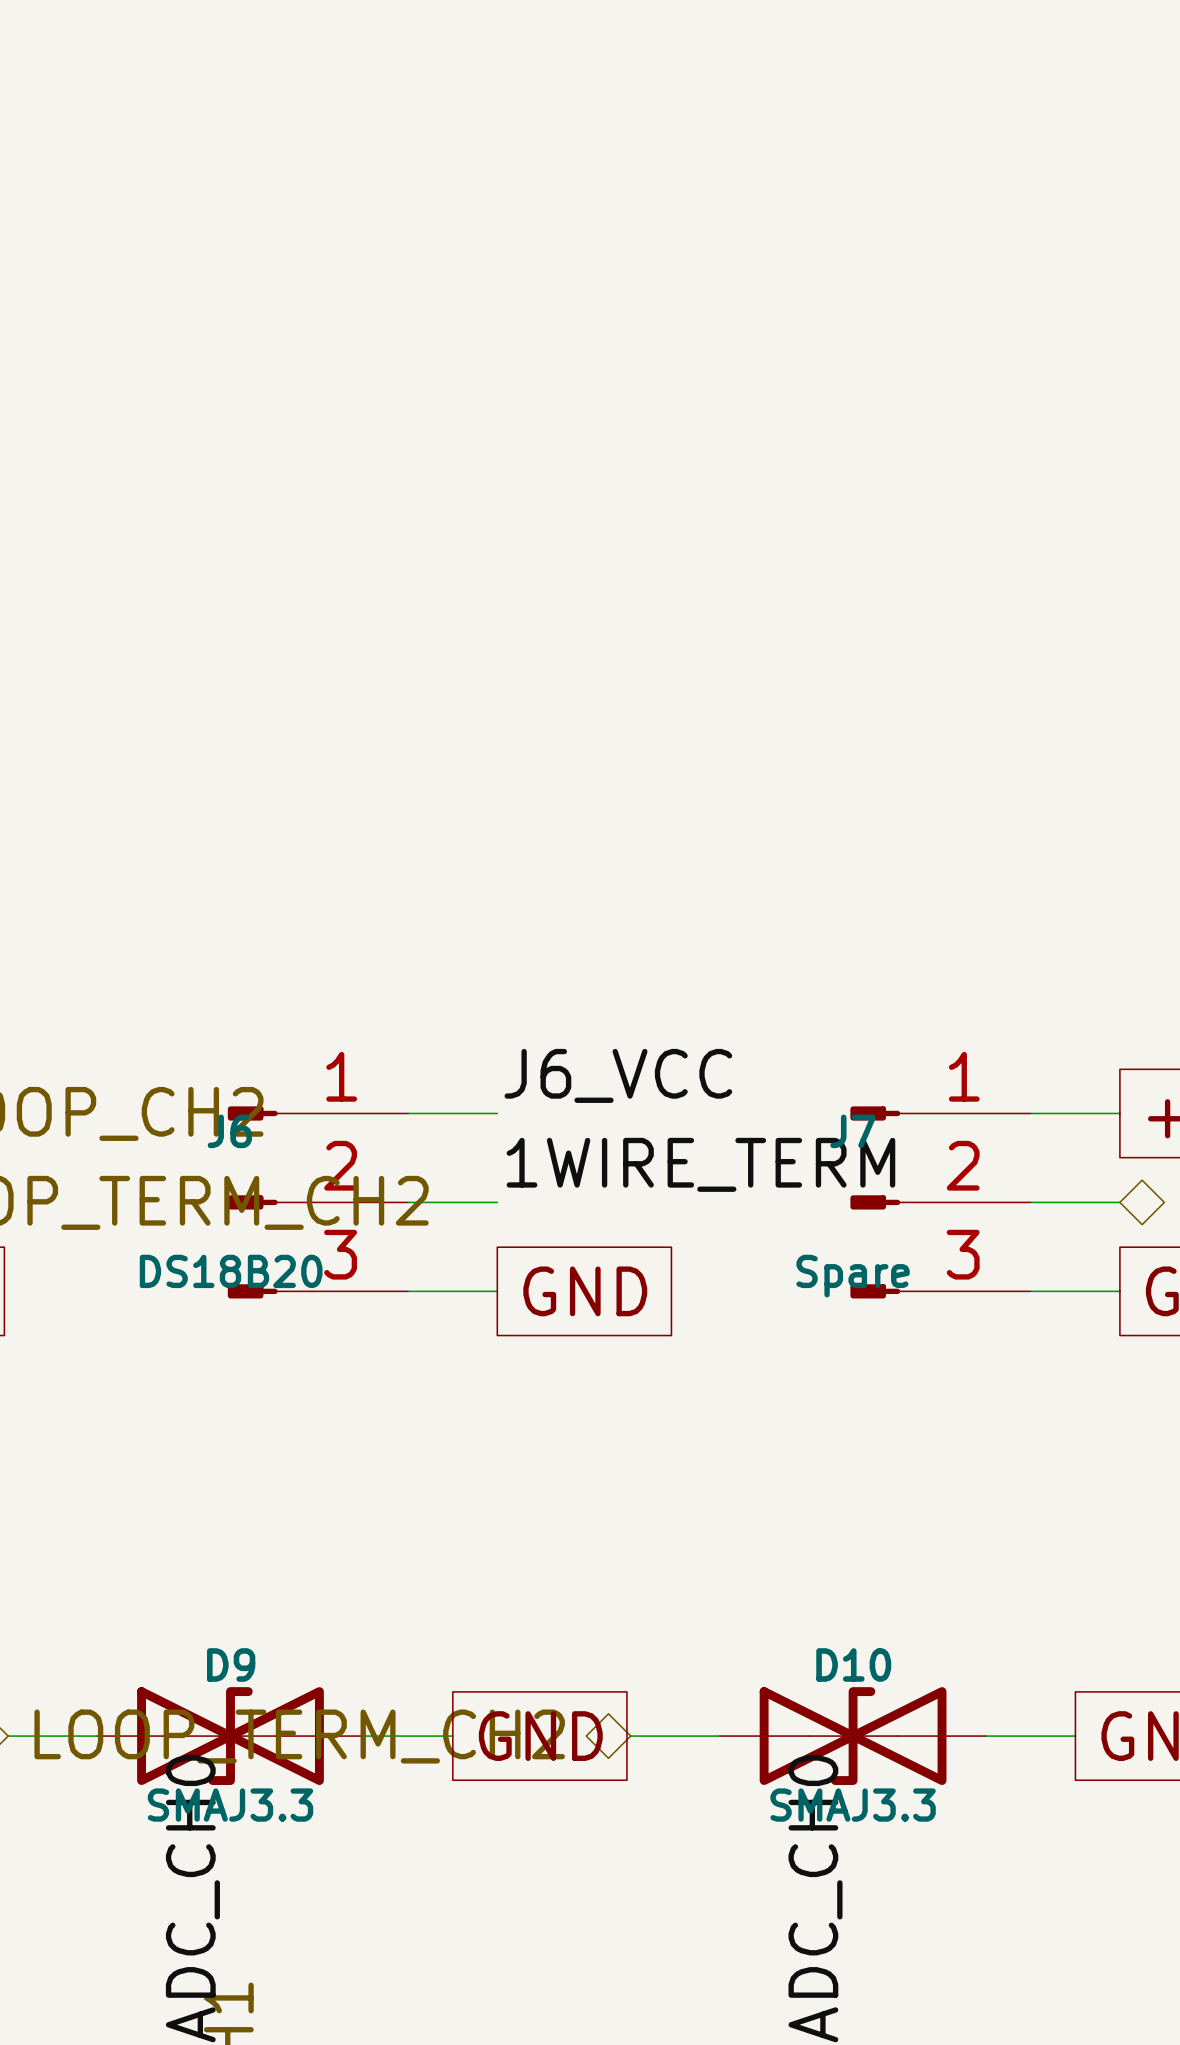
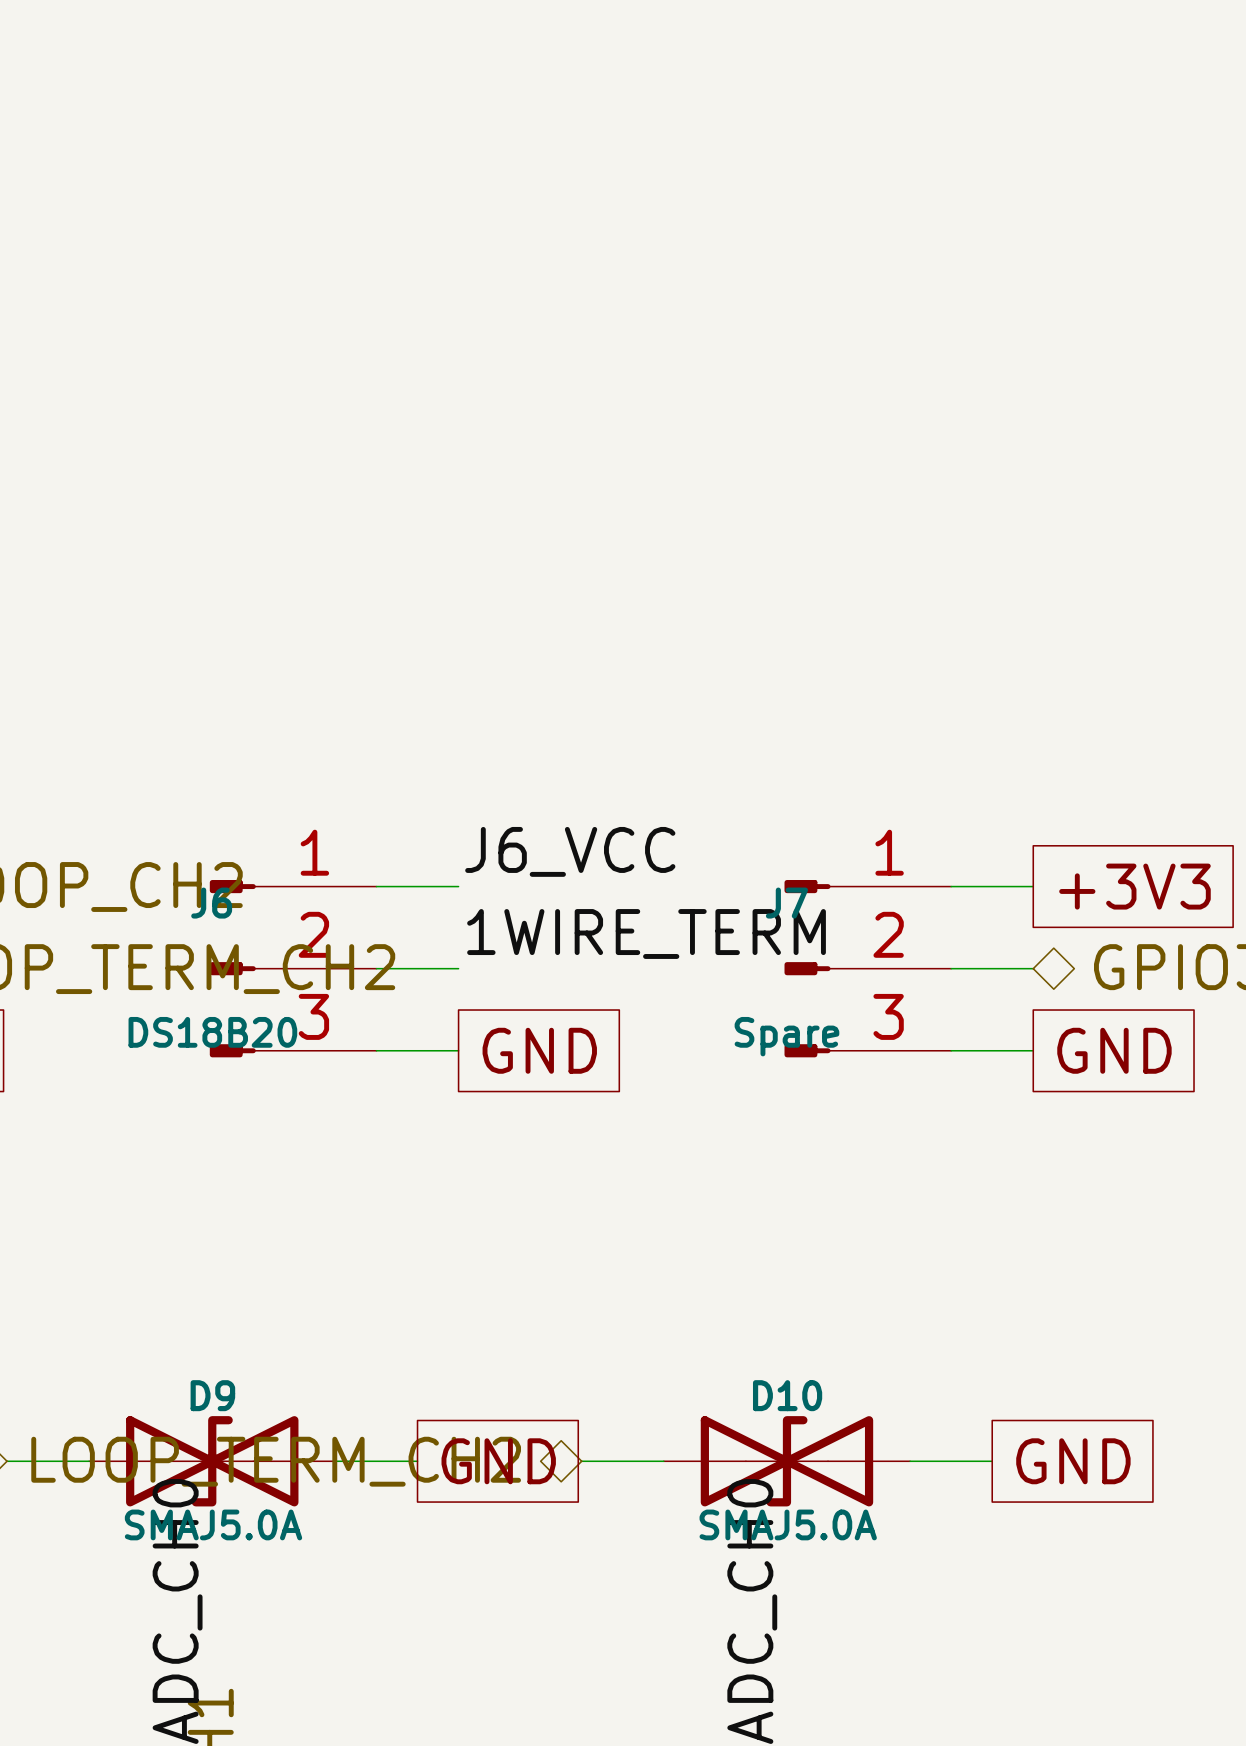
D9 value: SMAJ3.3 (230, 1805) -> SMAJ5.0A (213, 1524)
D10 value: SMAJ3.3 (853, 1805) -> SMAJ5.0A (788, 1524)

